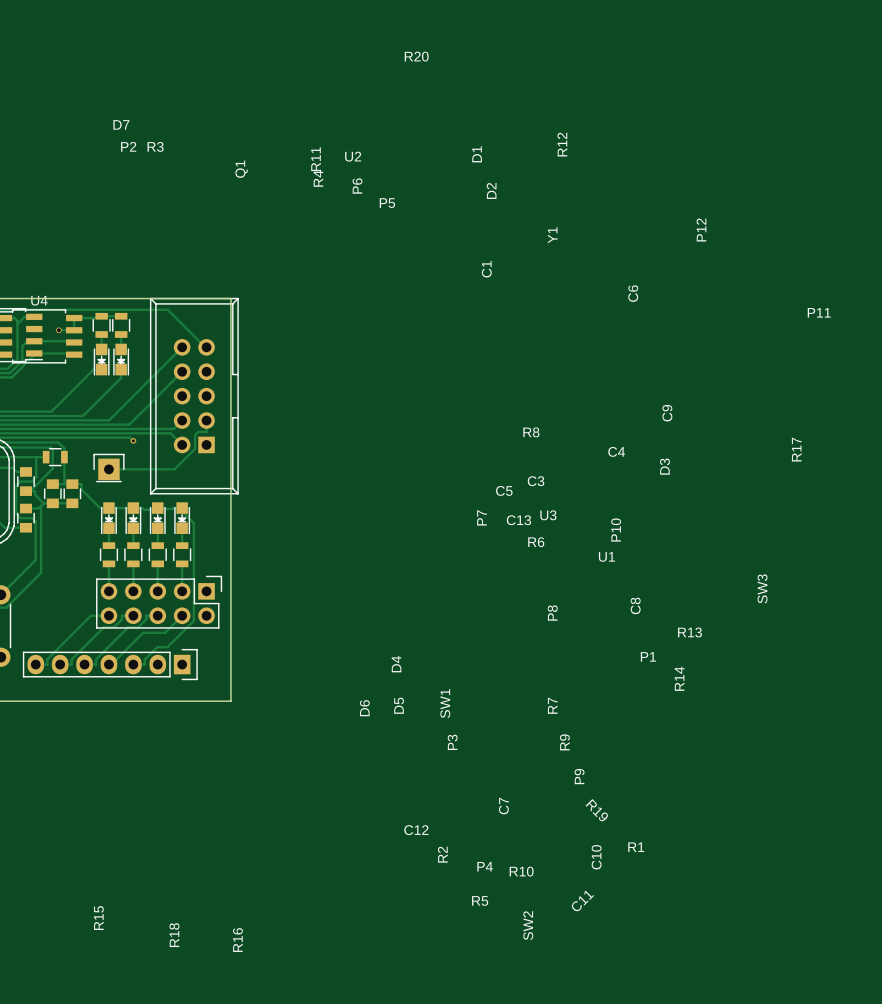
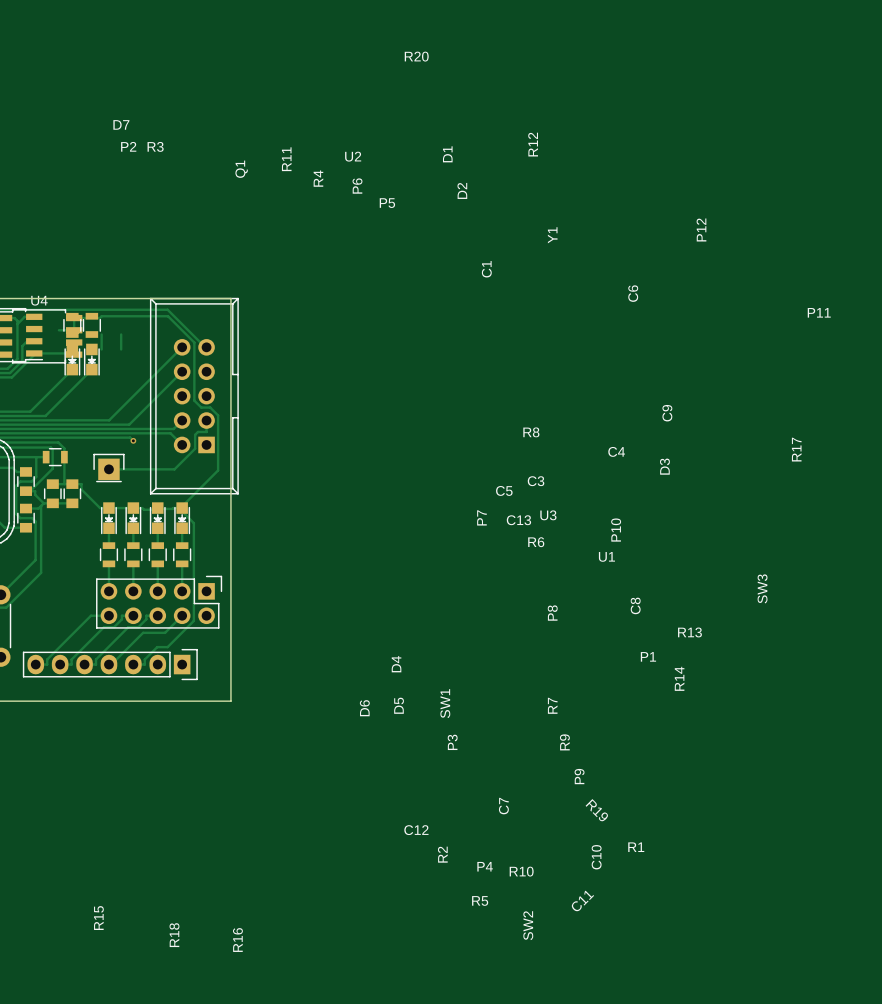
track: none -> (121, 316) (168, 316) (194, 342) (194, 400) (201, 407) (210, 407) (218, 415) (218, 470) (180, 508)
R11 position: (101, 325) -> (72, 325)
R12 position: (121, 325) -> (91, 325)
via: (58, 330) -> none
track: (34, 341) (74, 342) -> none
D1 position: (101, 359) -> (72, 359)
D2 position: (121, 359) -> (91, 359)
track: (101, 369) (93, 369) (51, 411) (30, 411) -> (72, 369) (30, 411)
track: (121, 369) (121, 377) (82, 416) (45, 416) -> (91, 369) (45, 416)

